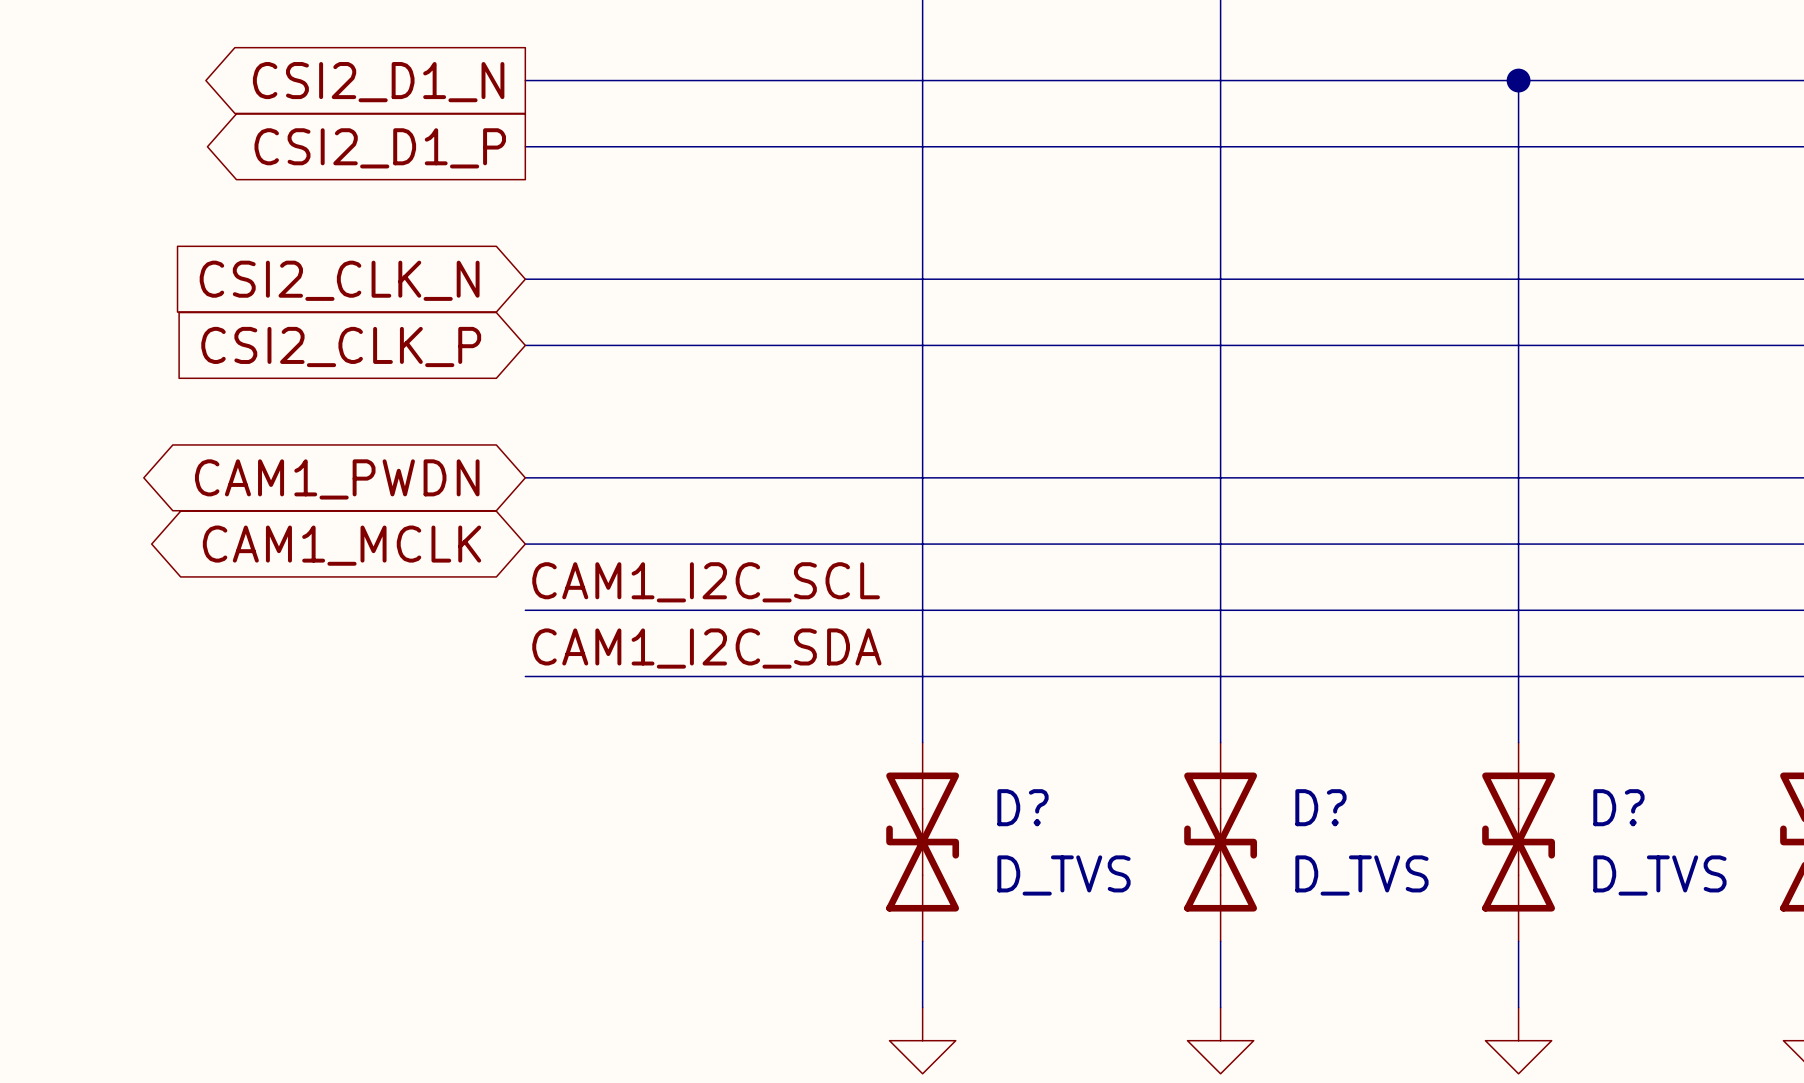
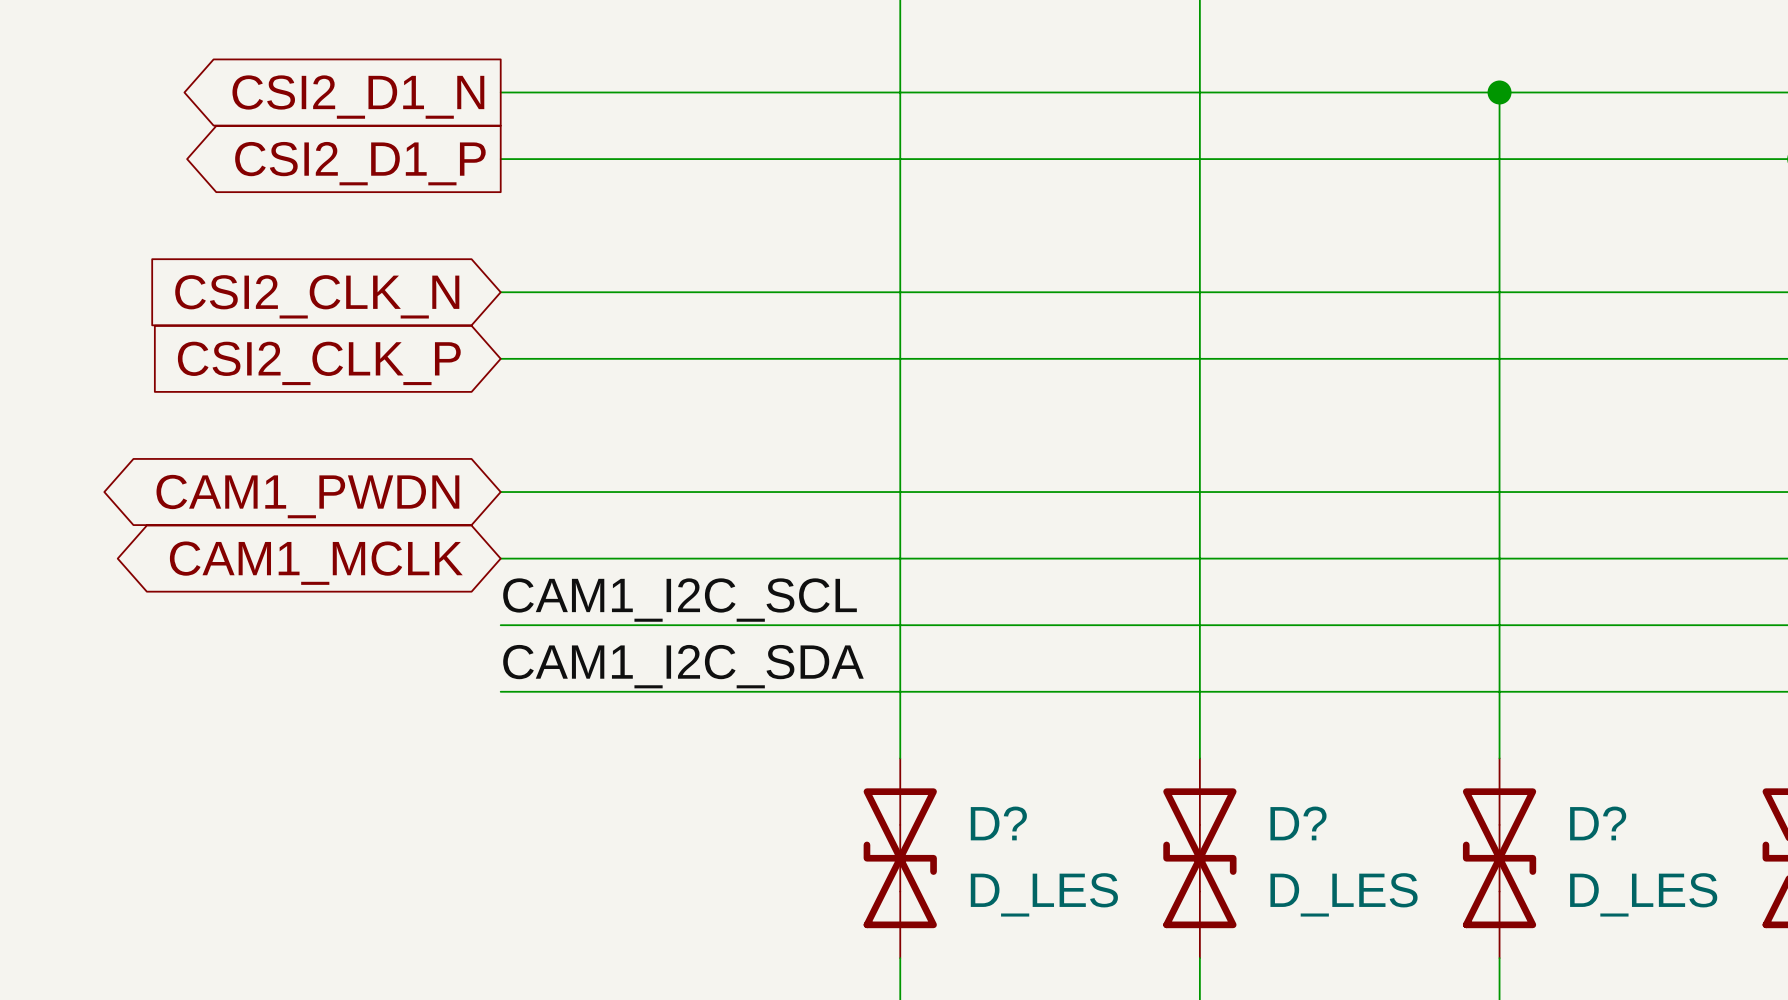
D? value: D_TVS (1063, 875) -> D_LES (1044, 894)
D? value: D_TVS (1361, 875) -> D_LES (1344, 894)
D? value: D_TVS (1659, 875) -> D_LES (1643, 894)

